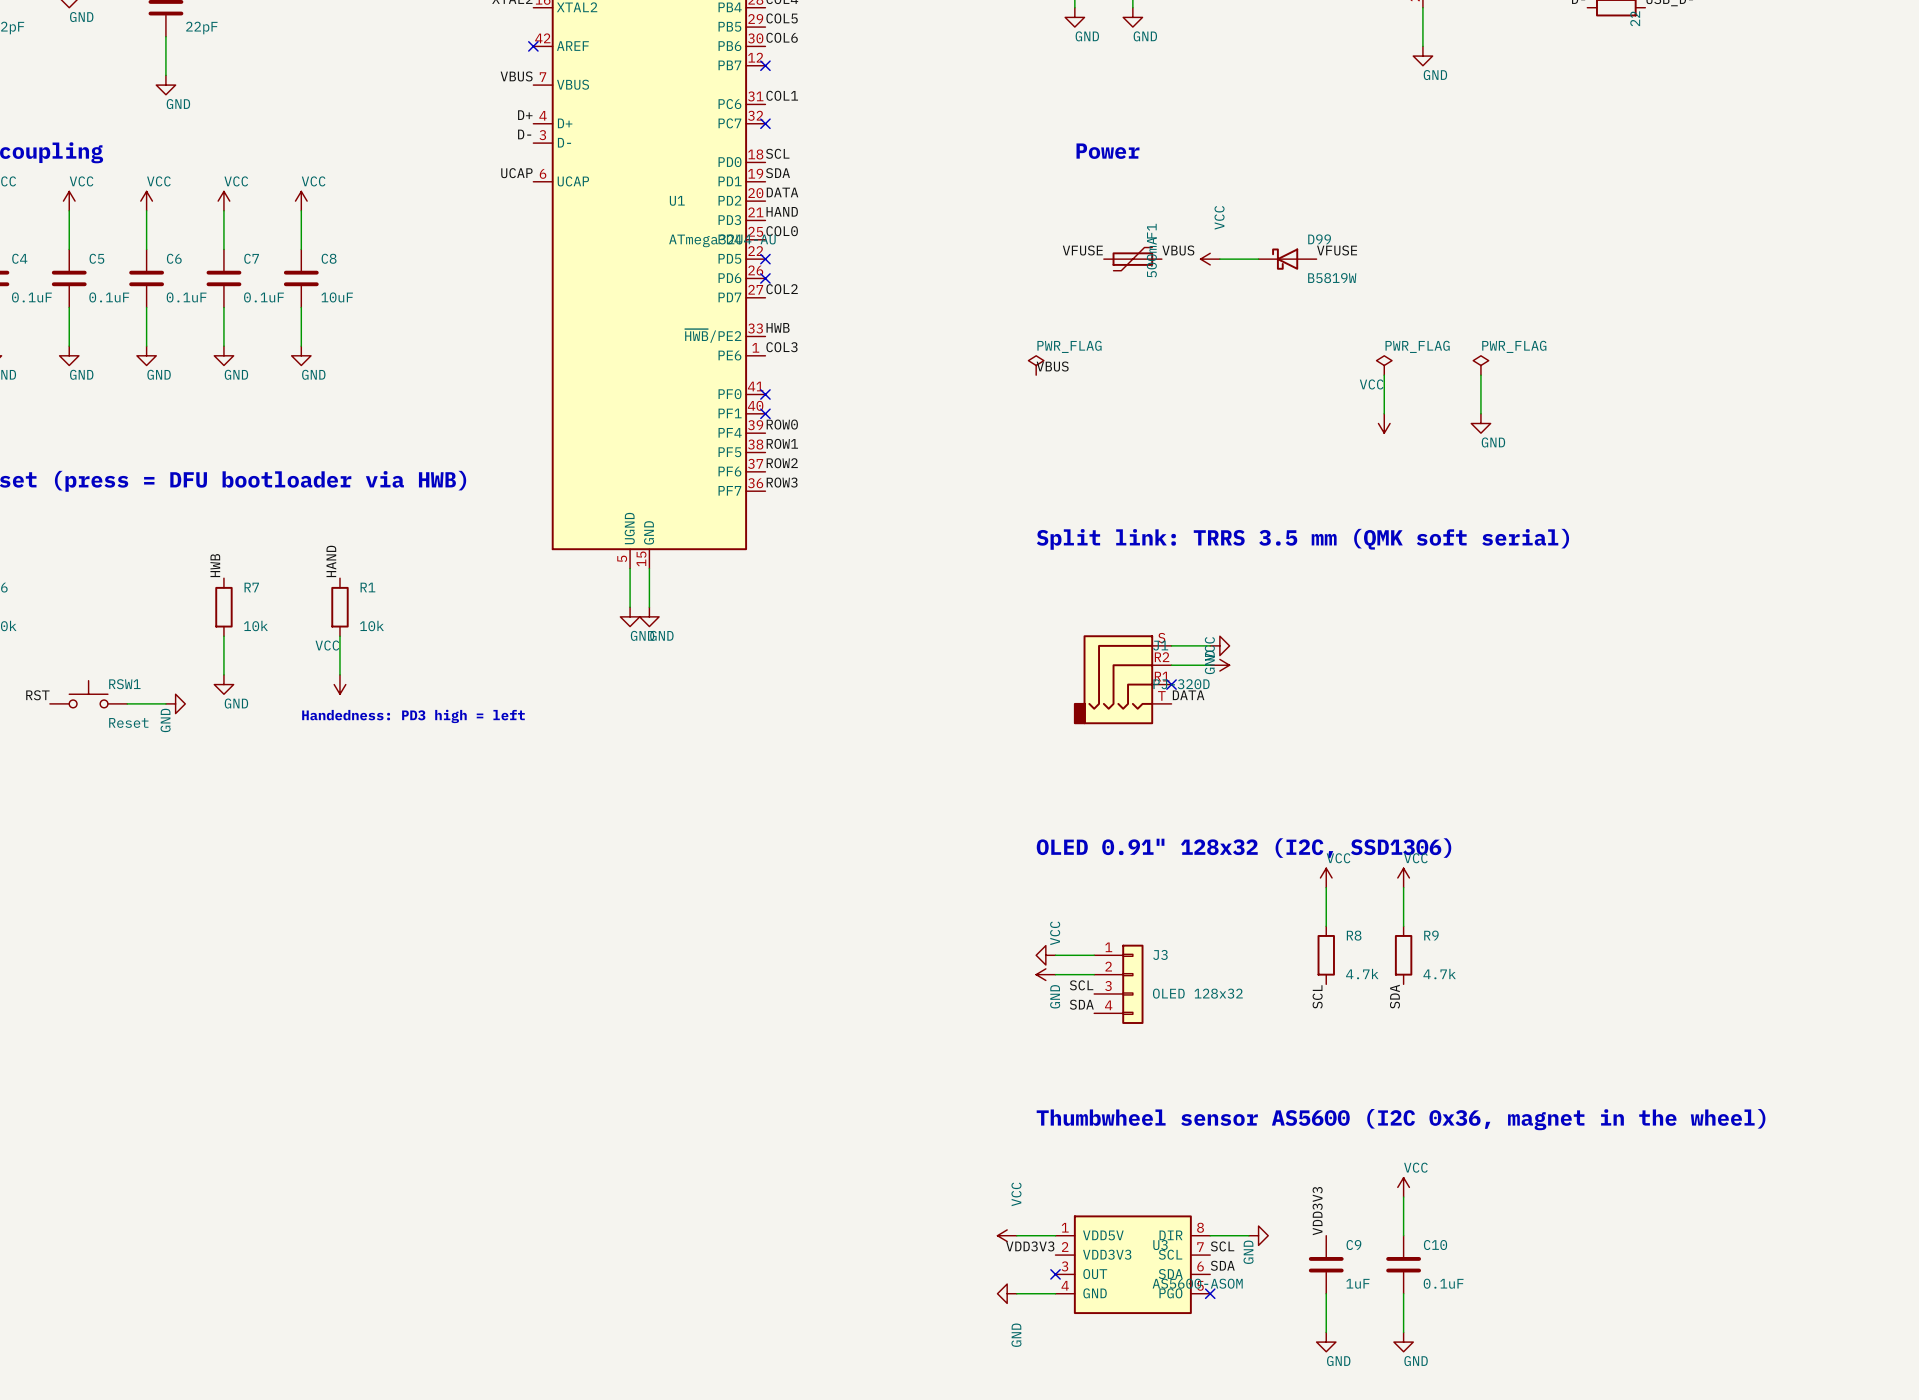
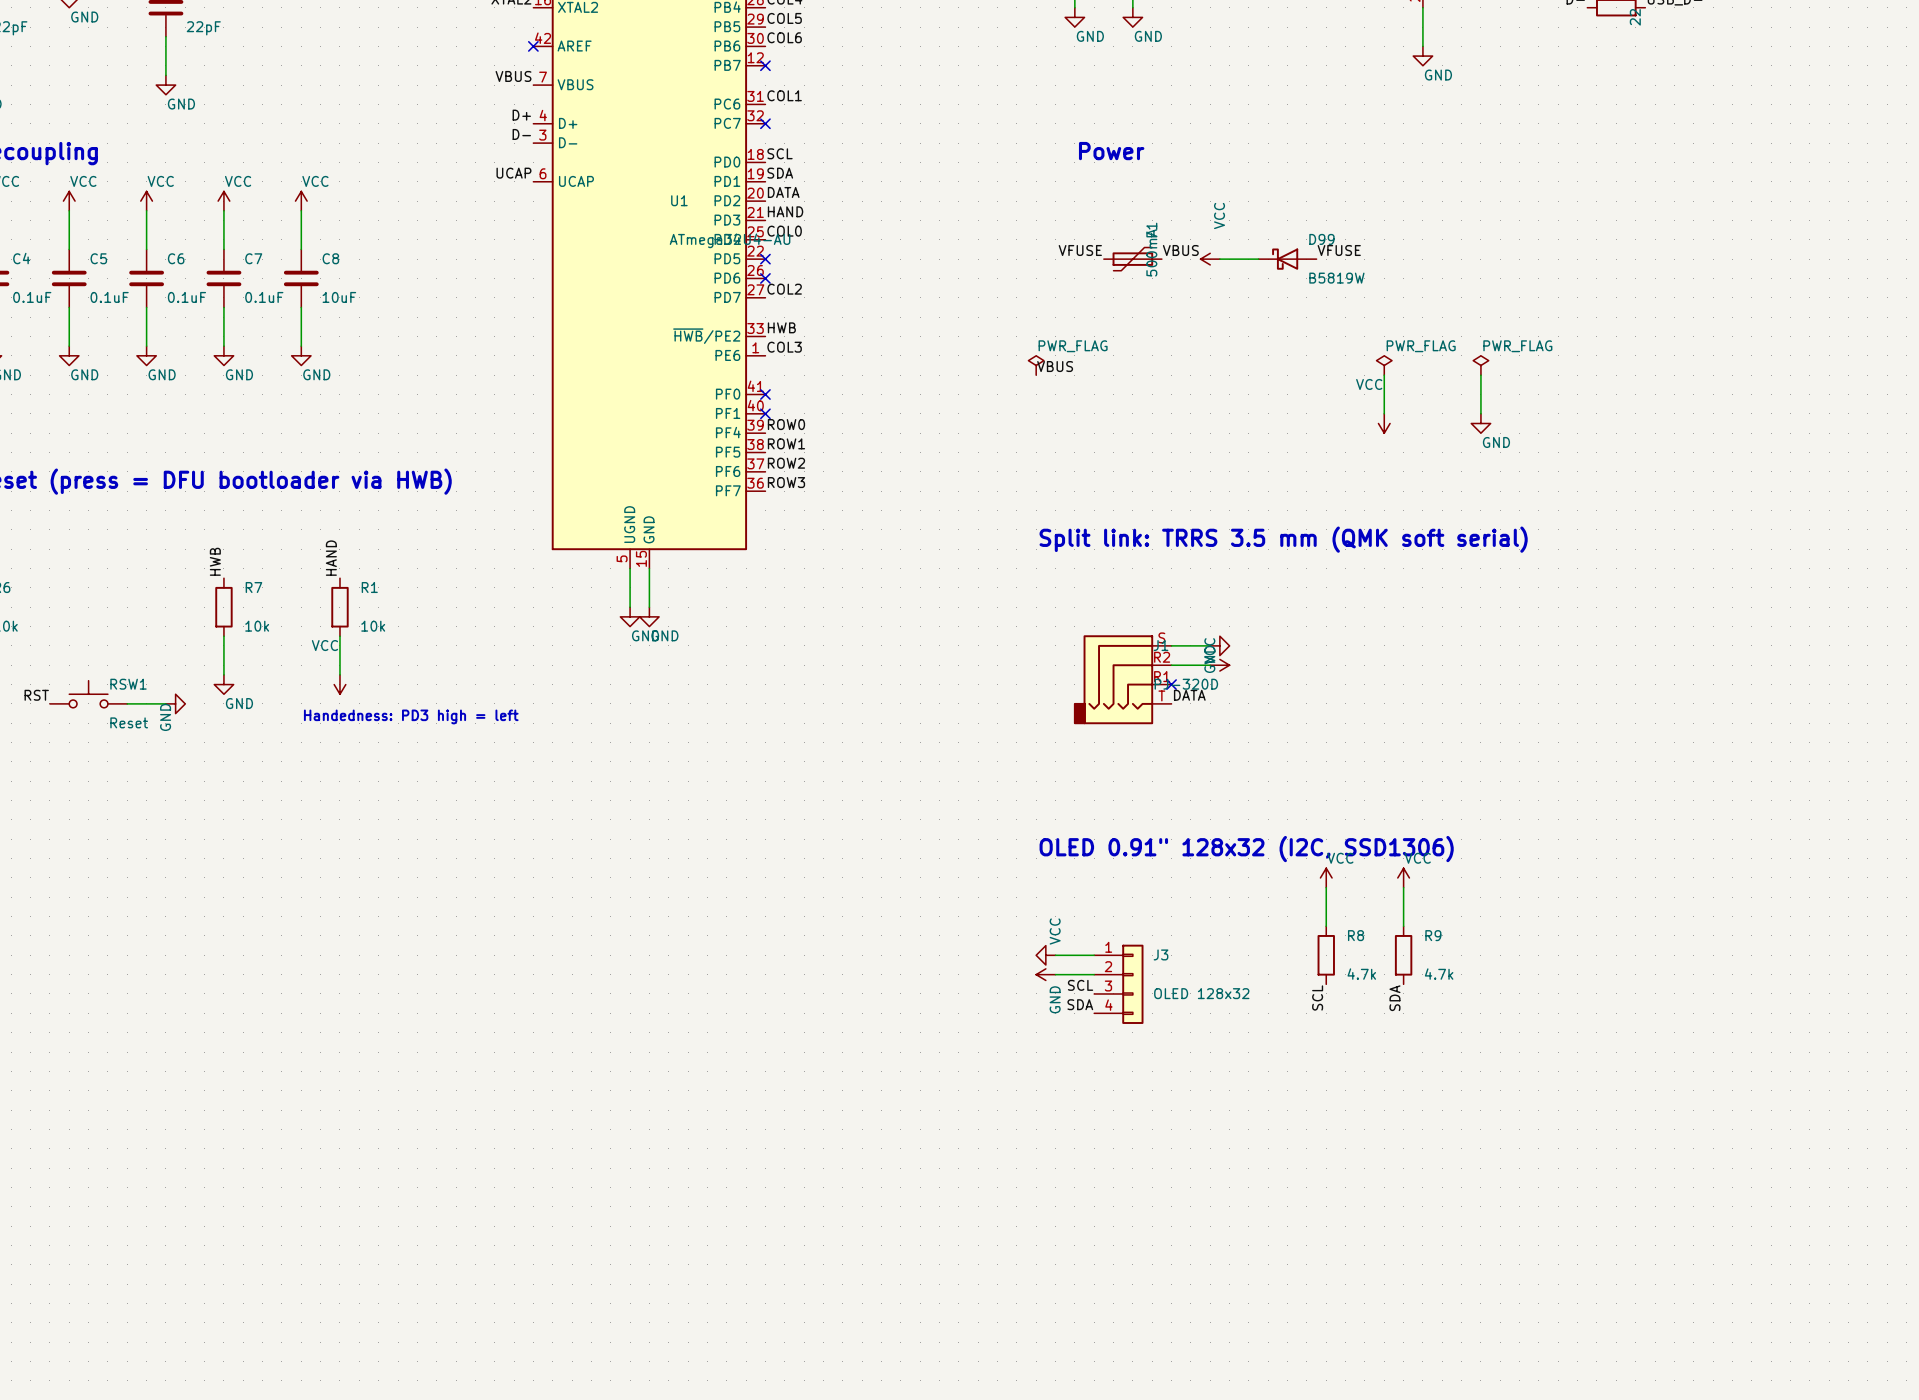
text: Thumbwheel sensor AS5600 (I2C 0x36, magnet in the wheel) (1401, 1119) -> none
power symbol: VCC (1403, 1187) -> none
wire: (1403, 1197) (1403, 1235) -> none
label: VDD3V3 (1317, 1211) -> none
power symbol: VCC (1007, 1235) -> none
wire: (1016, 1235) (1055, 1235) -> none
wire: (1210, 1235) (1248, 1235) -> none
power symbol: GND (1258, 1235) -> none
label: VDD3V3 (1030, 1246) -> none
label: SCL (1222, 1246) -> none
U3: AS5600-ASOM (1132, 1264) -> none
C9: 1uF (1326, 1264) -> none
C10: 0.1uF (1403, 1264) -> none
label: SDA (1222, 1265) -> none
no-connect mark: (1055, 1274) -> none
power symbol: GND (1007, 1293) -> none
wire: (1016, 1293) (1055, 1293) -> none
no-connect mark: (1210, 1293) -> none
wire: (1326, 1293) (1326, 1332) -> none
wire: (1403, 1293) (1403, 1332) -> none
power symbol: GND (1326, 1342) -> none
power symbol: GND (1403, 1342) -> none

